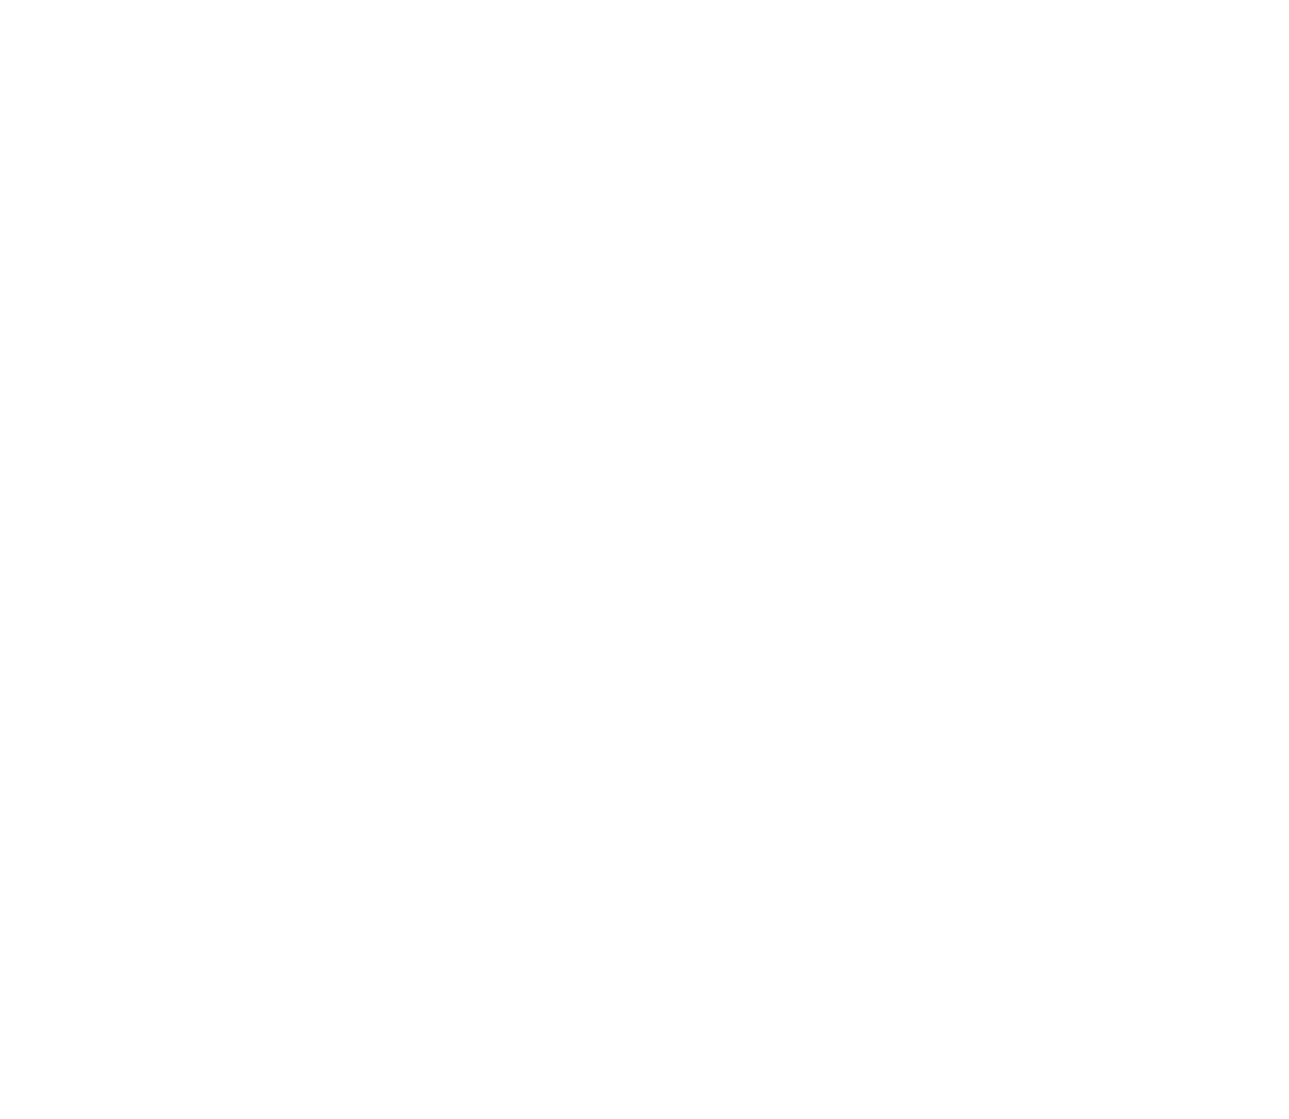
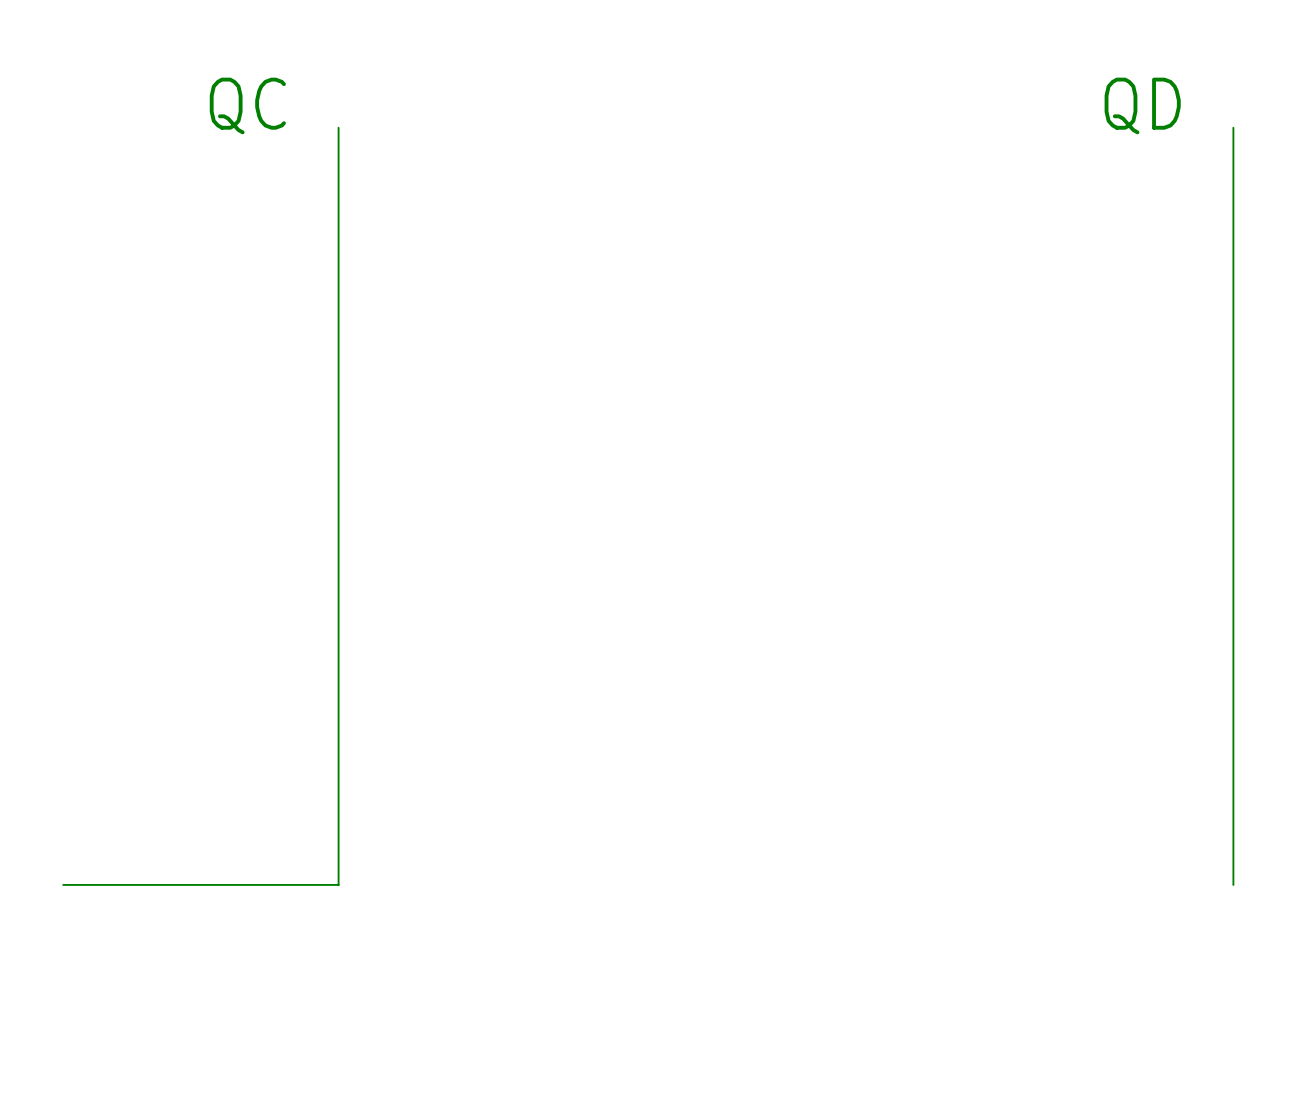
text: none -> QC (247, 105)
text: none -> QD (1142, 105)
wire: none -> (338, 127) (338, 884) (63, 884)
wire: none -> (1233, 127) (1233, 884)

